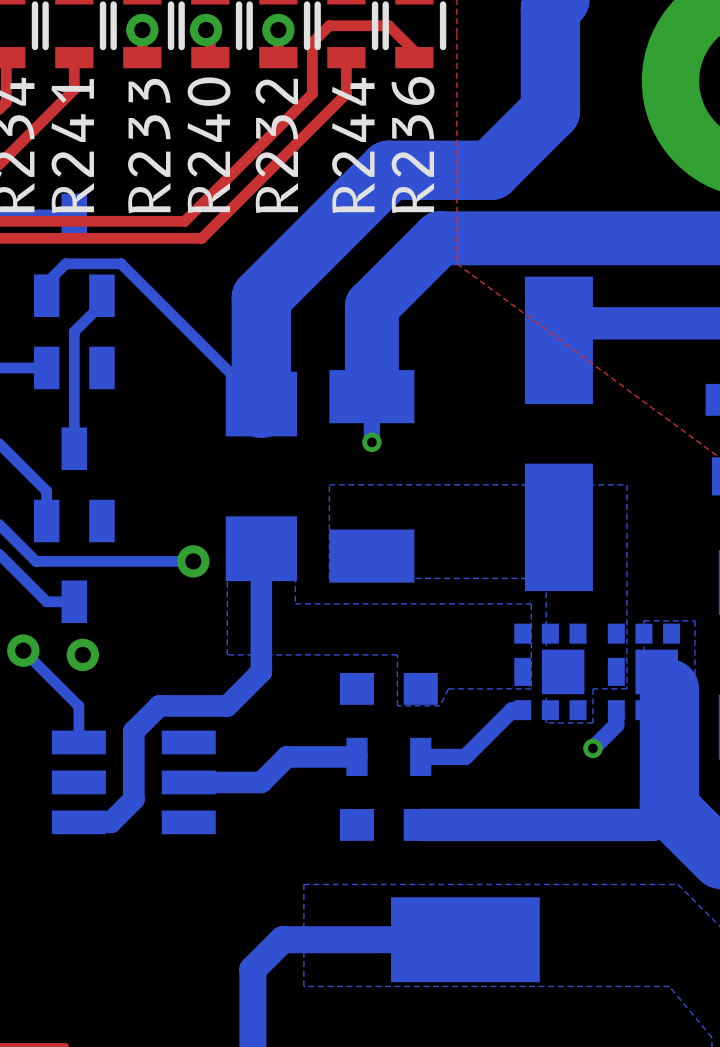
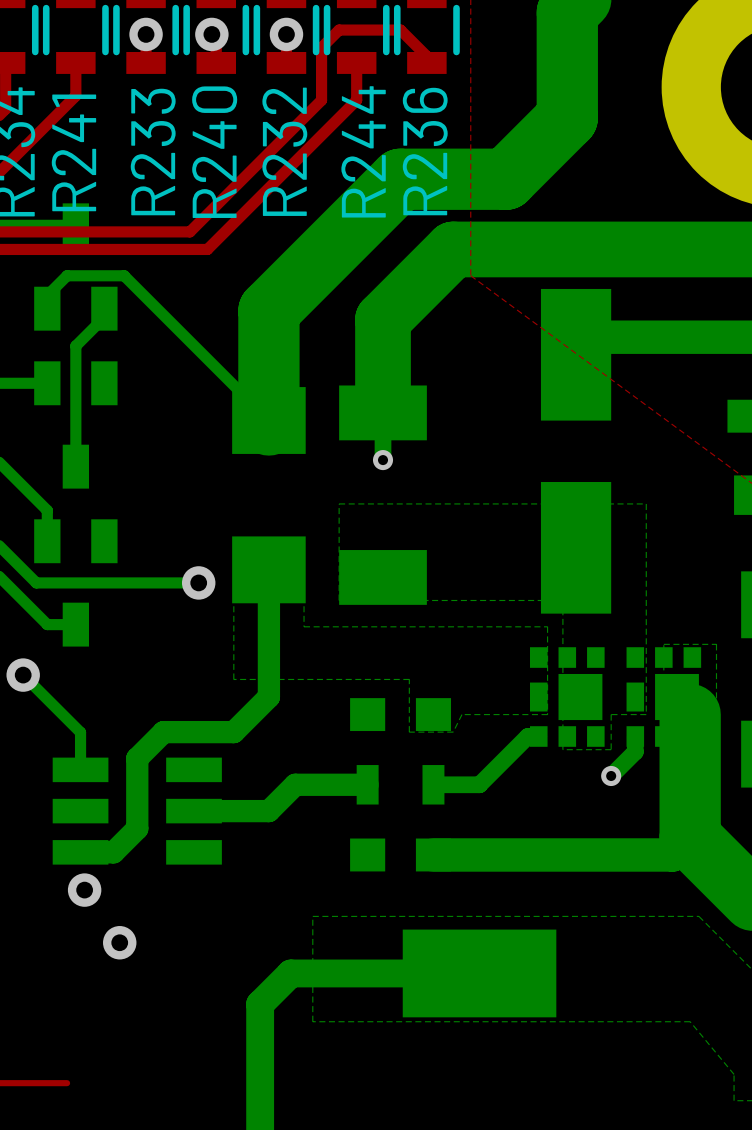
via: (82, 654) -> none
via: none -> (84, 890)
via: none -> (119, 942)

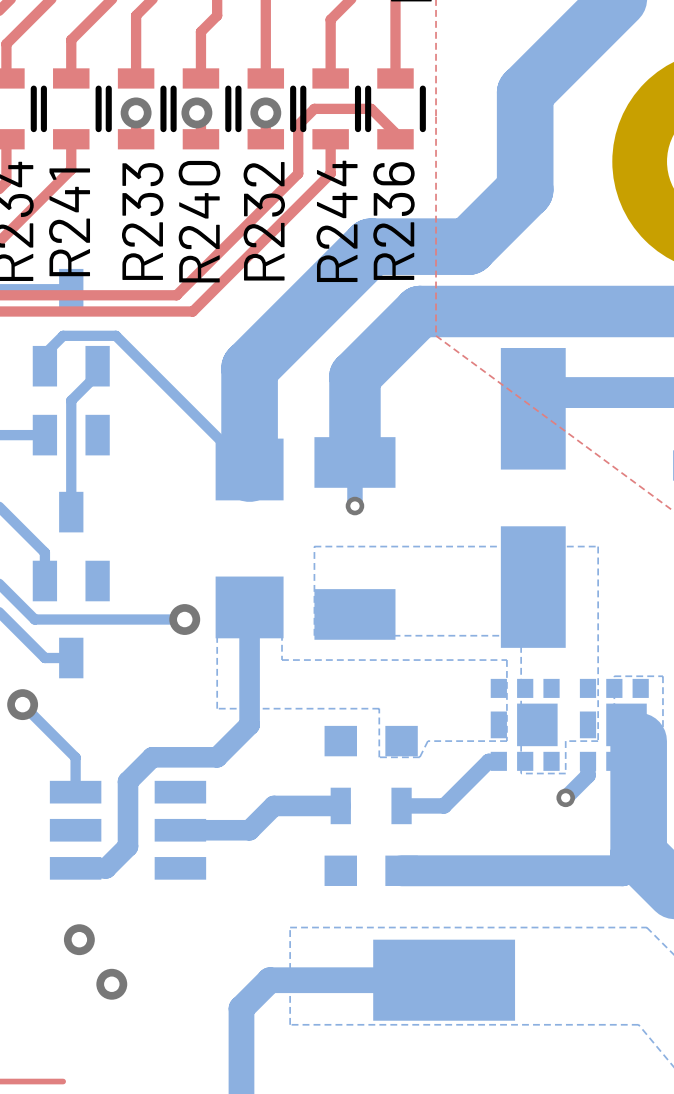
via: (84, 890) -> none
via: none -> (79, 939)
via: (119, 942) -> none
via: none -> (111, 984)

